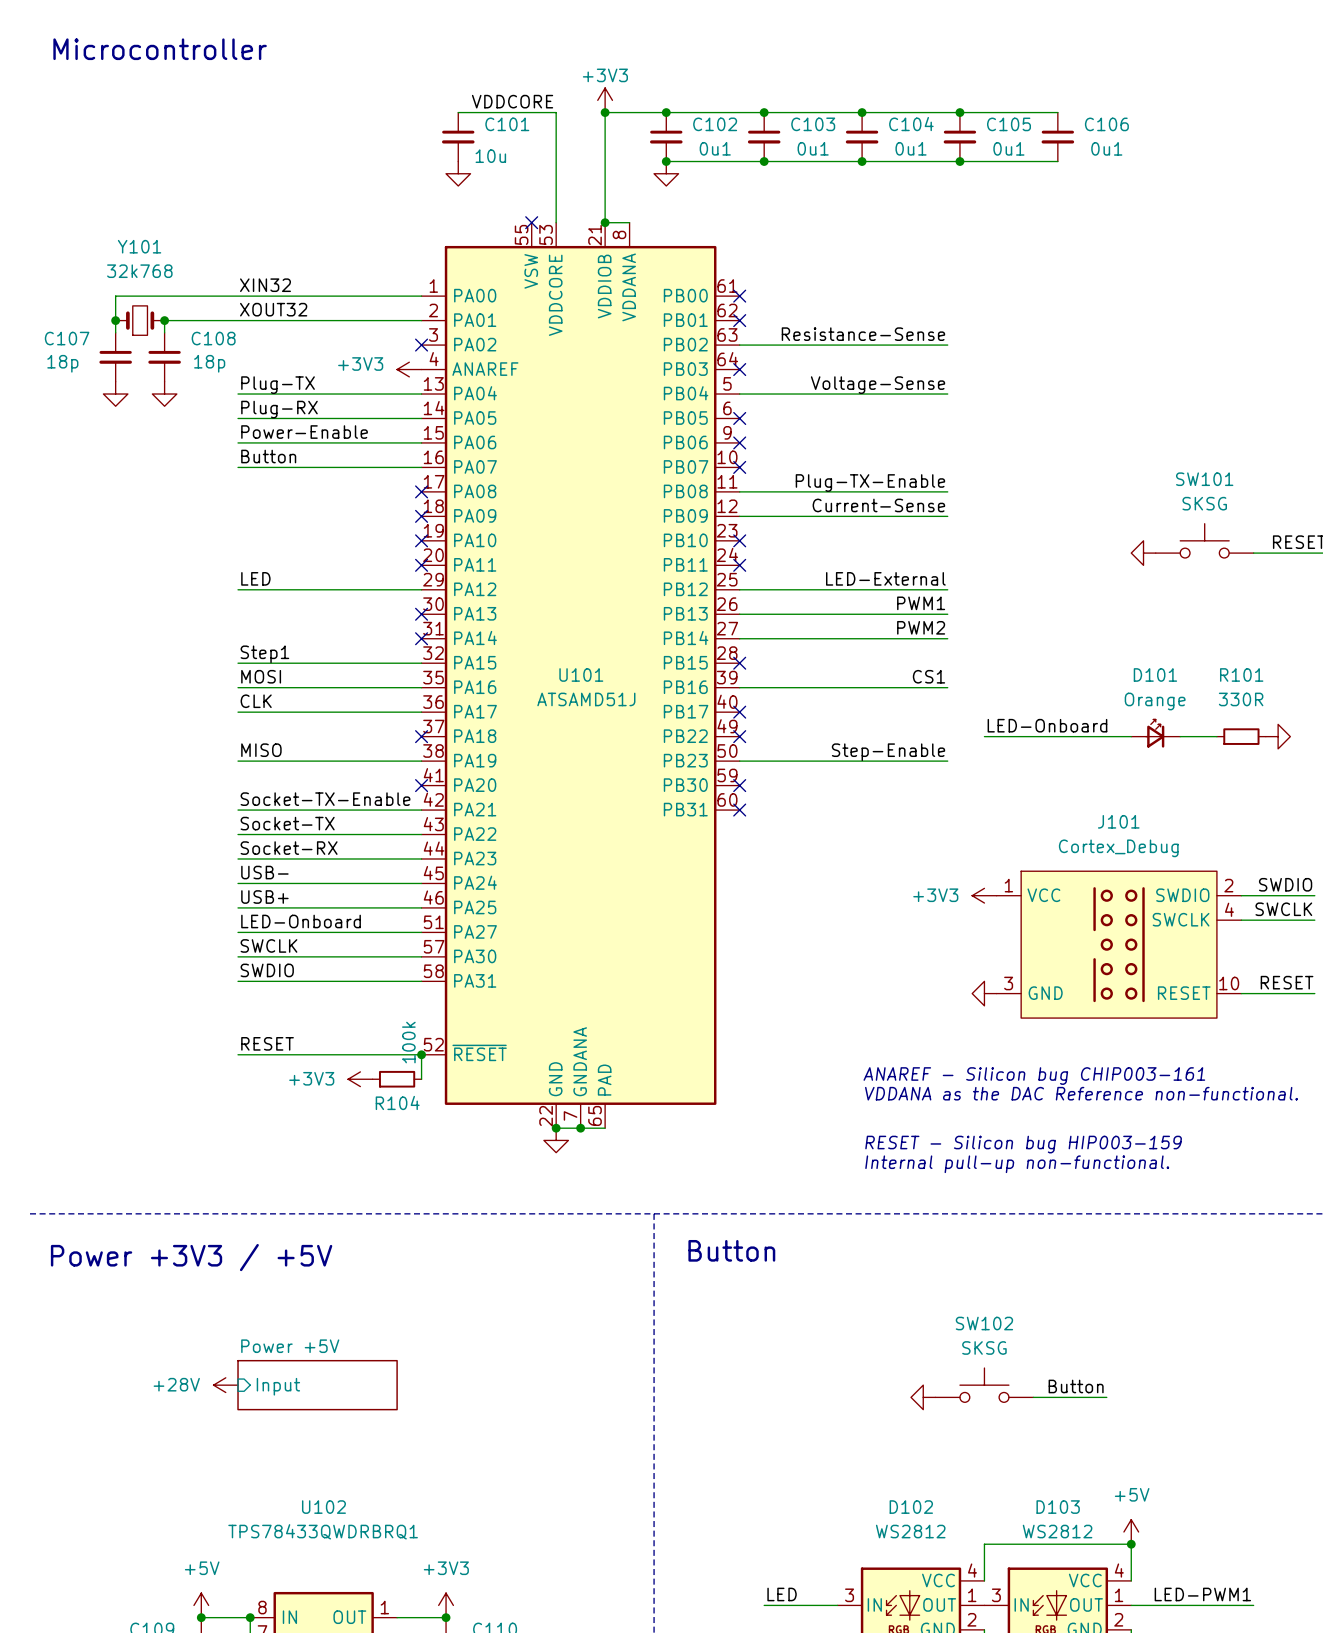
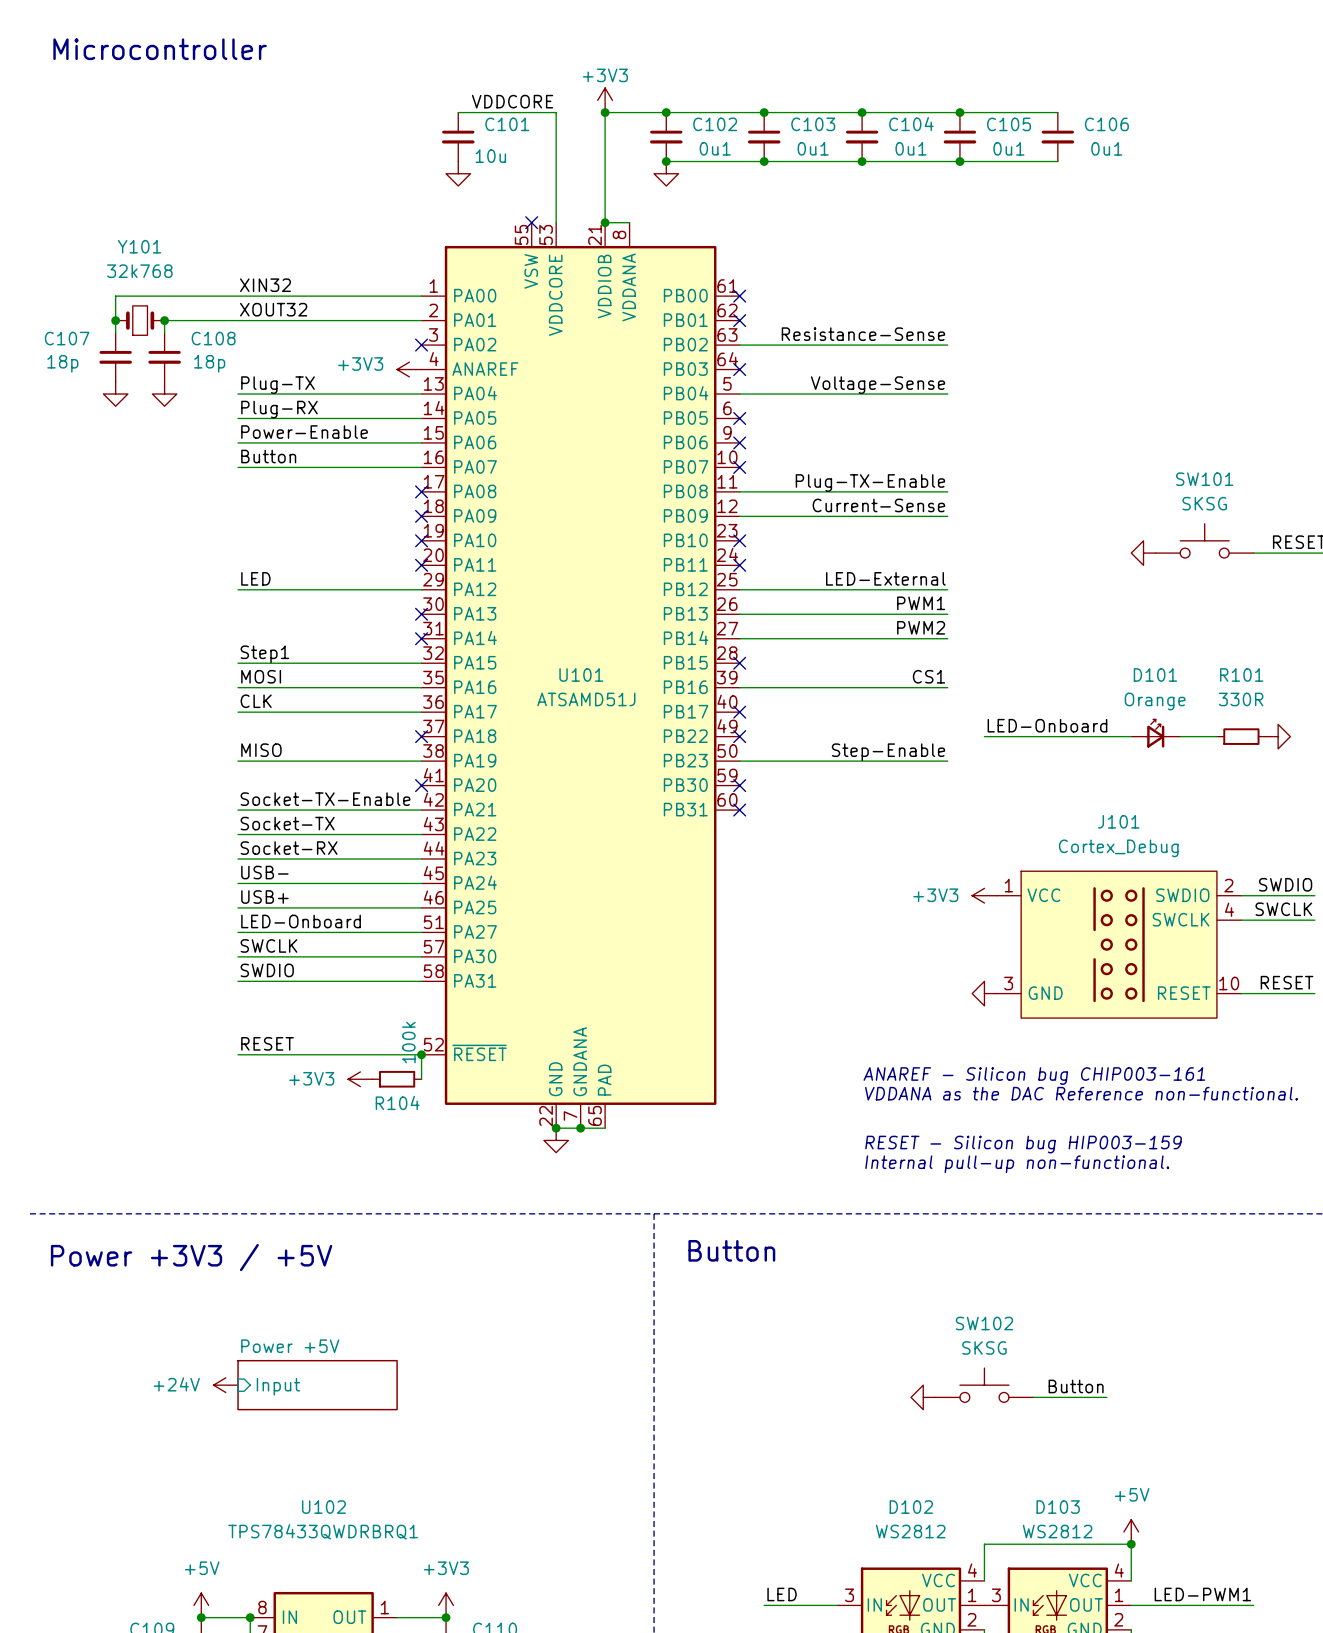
power symbol: +28V (225, 1385) -> +24V (225, 1385)

